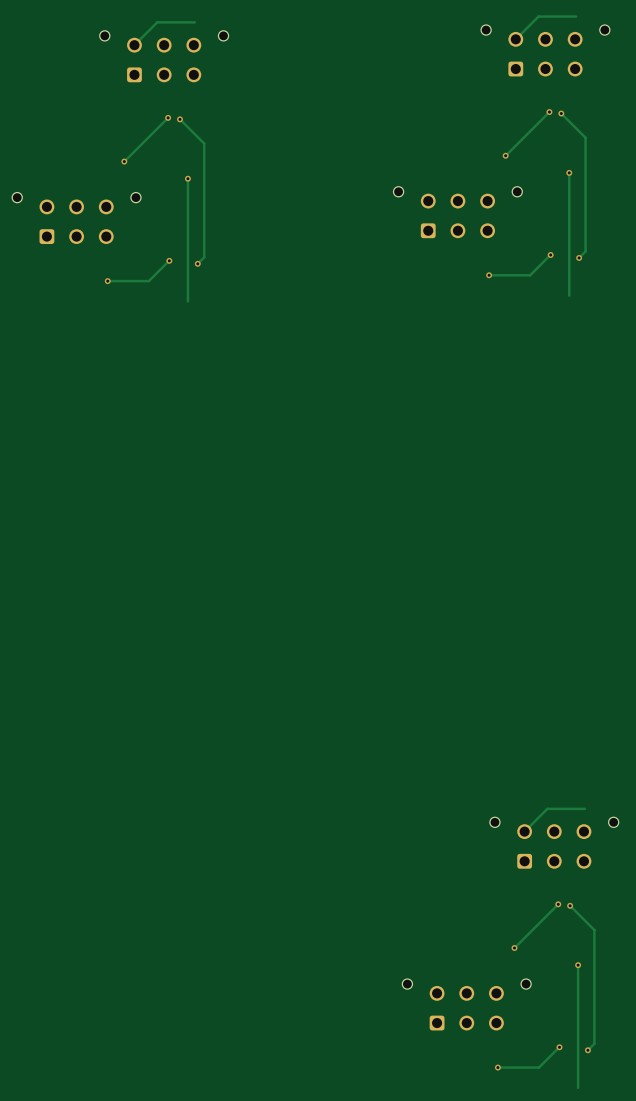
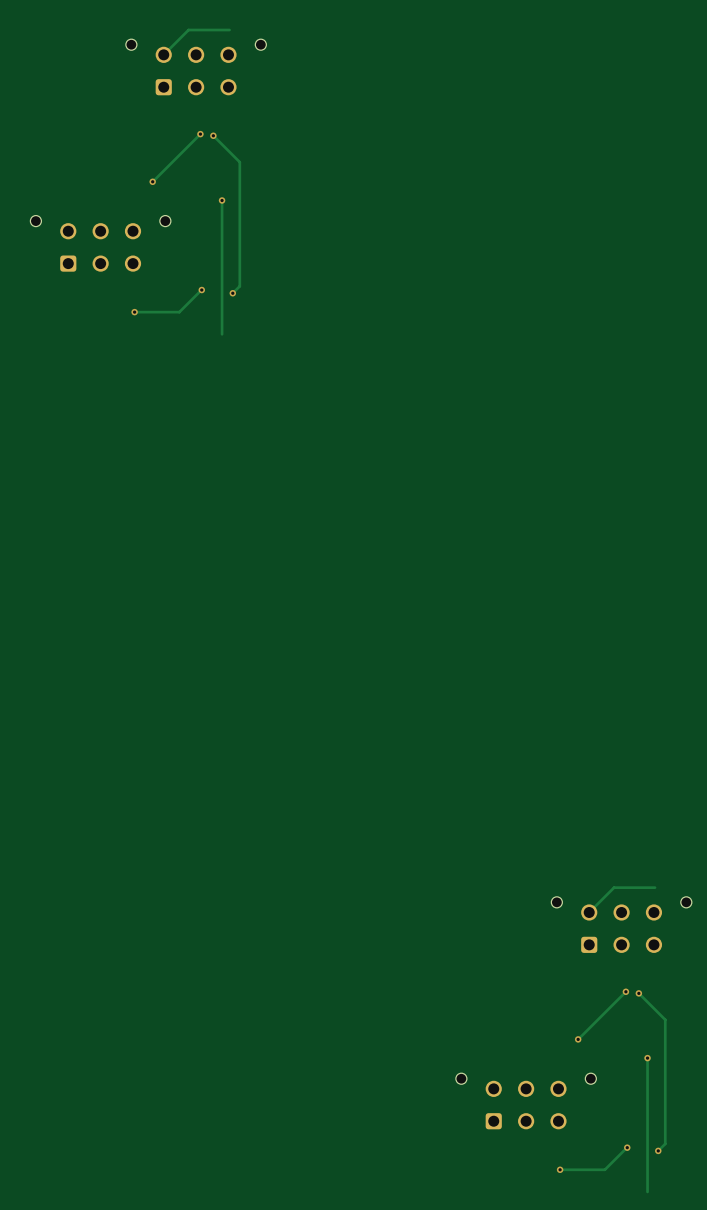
track: (576, 16) (538, 16) (515, 39) -> none
part: (545, 50) -> none
track: (549, 112) (505, 155) -> none
via: (549, 112) -> none
track: (561, 113) (585, 137) (585, 251) (579, 257) -> none
via: (561, 113) -> none
via: (505, 155) -> none
track: (569, 172) (569, 295) -> none
via: (569, 172) -> none
part: (457, 212) -> none
track: (550, 254) (530, 275) (489, 275) -> none
via: (550, 254) -> none
via: (579, 257) -> none
via: (489, 275) -> none

